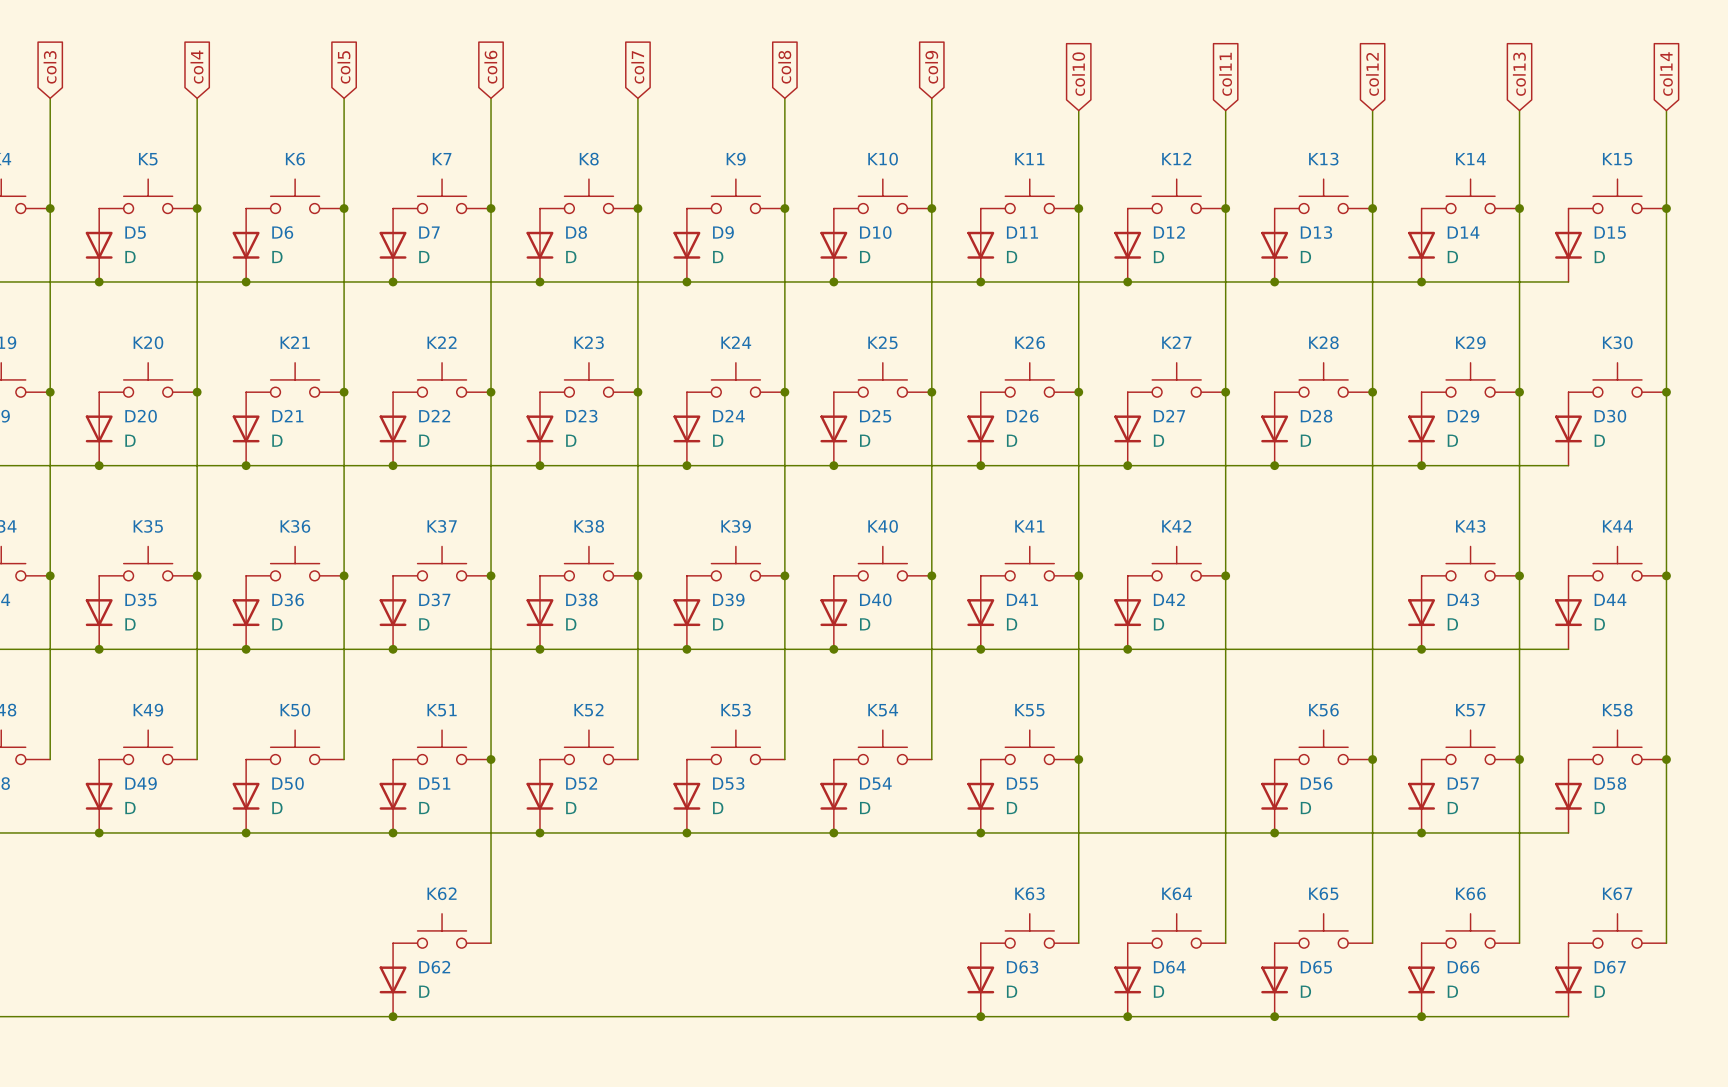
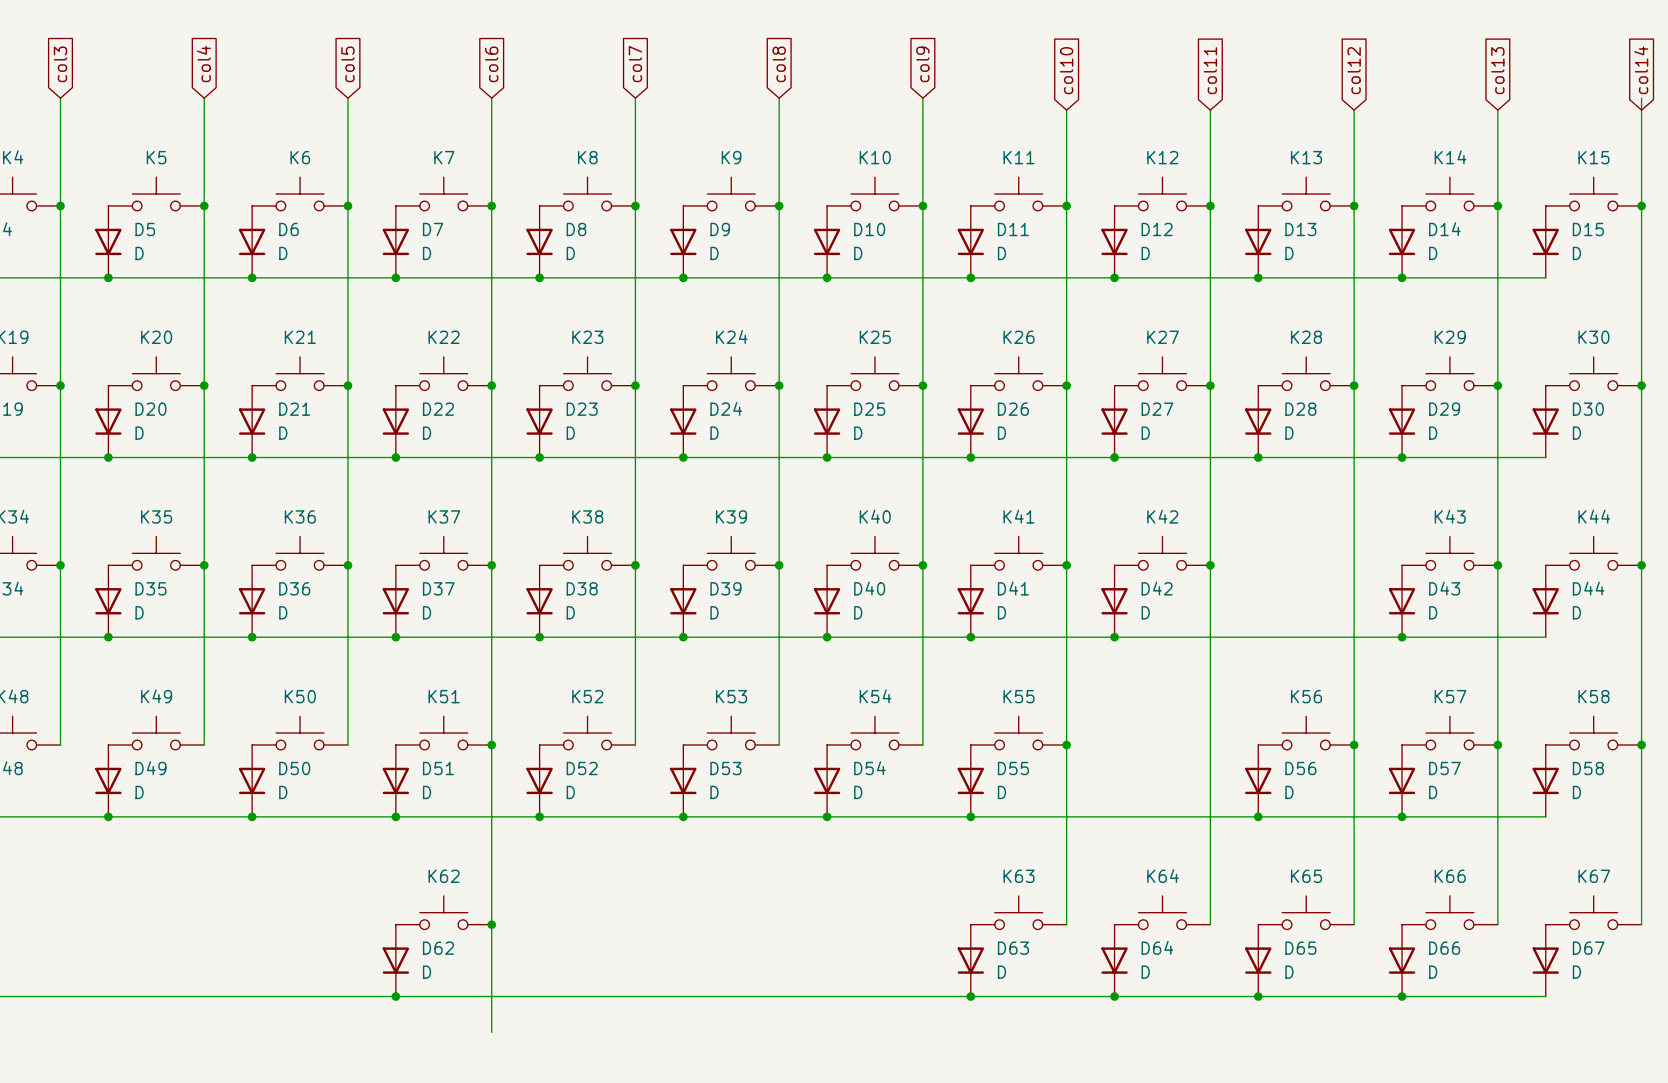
wire: none -> (1641, 98) (1641, 110)
wire: none -> (491, 924) (491, 1032)
junction: none -> (491, 924)

